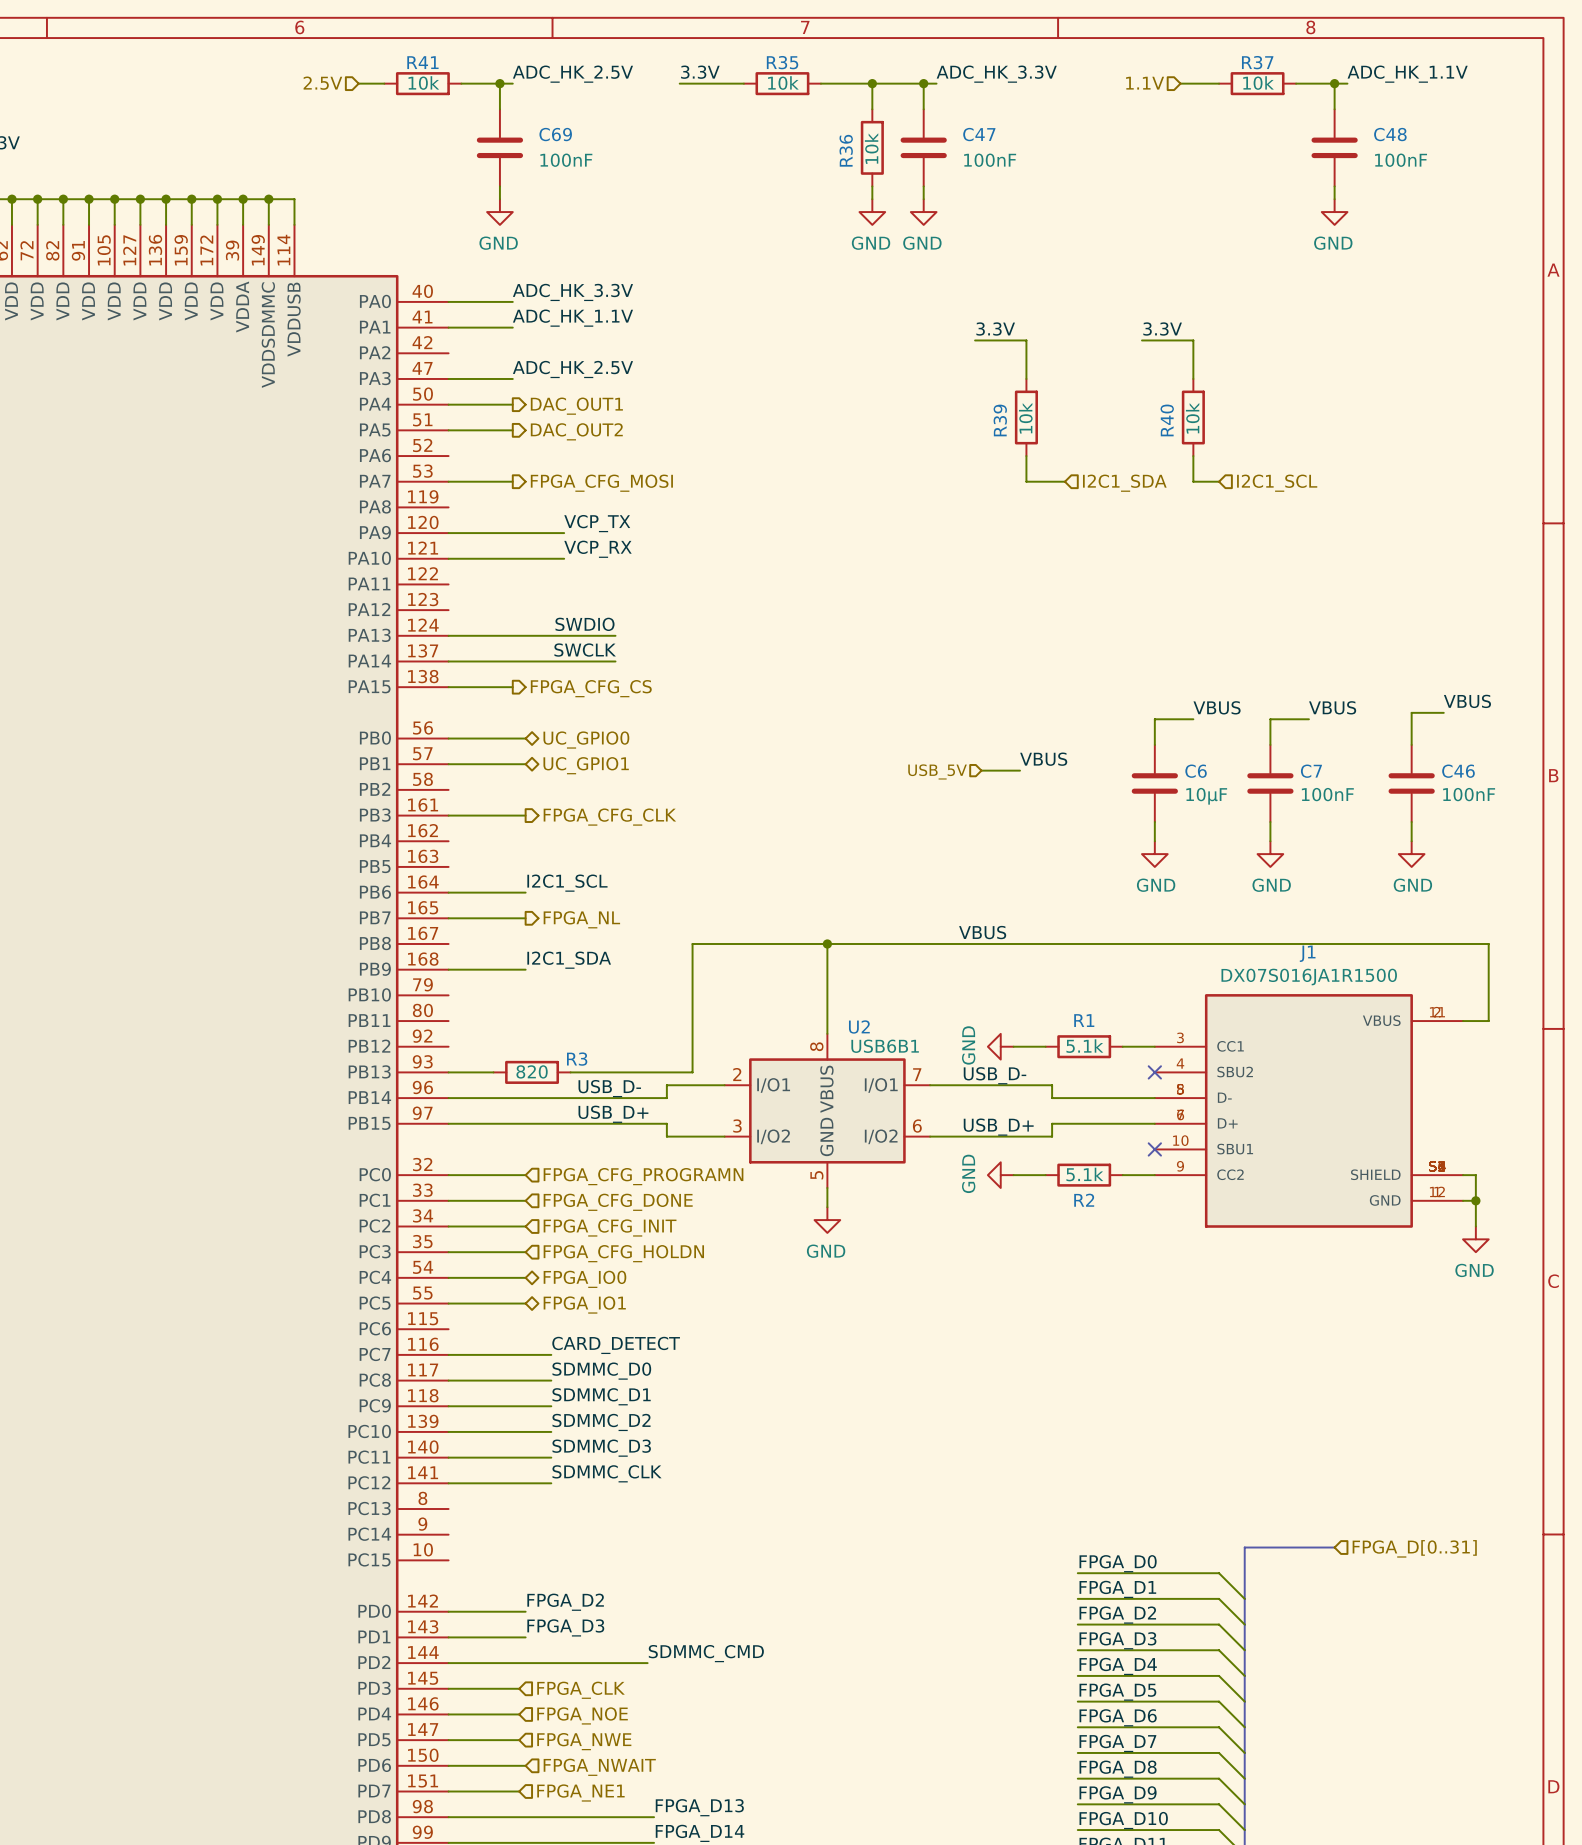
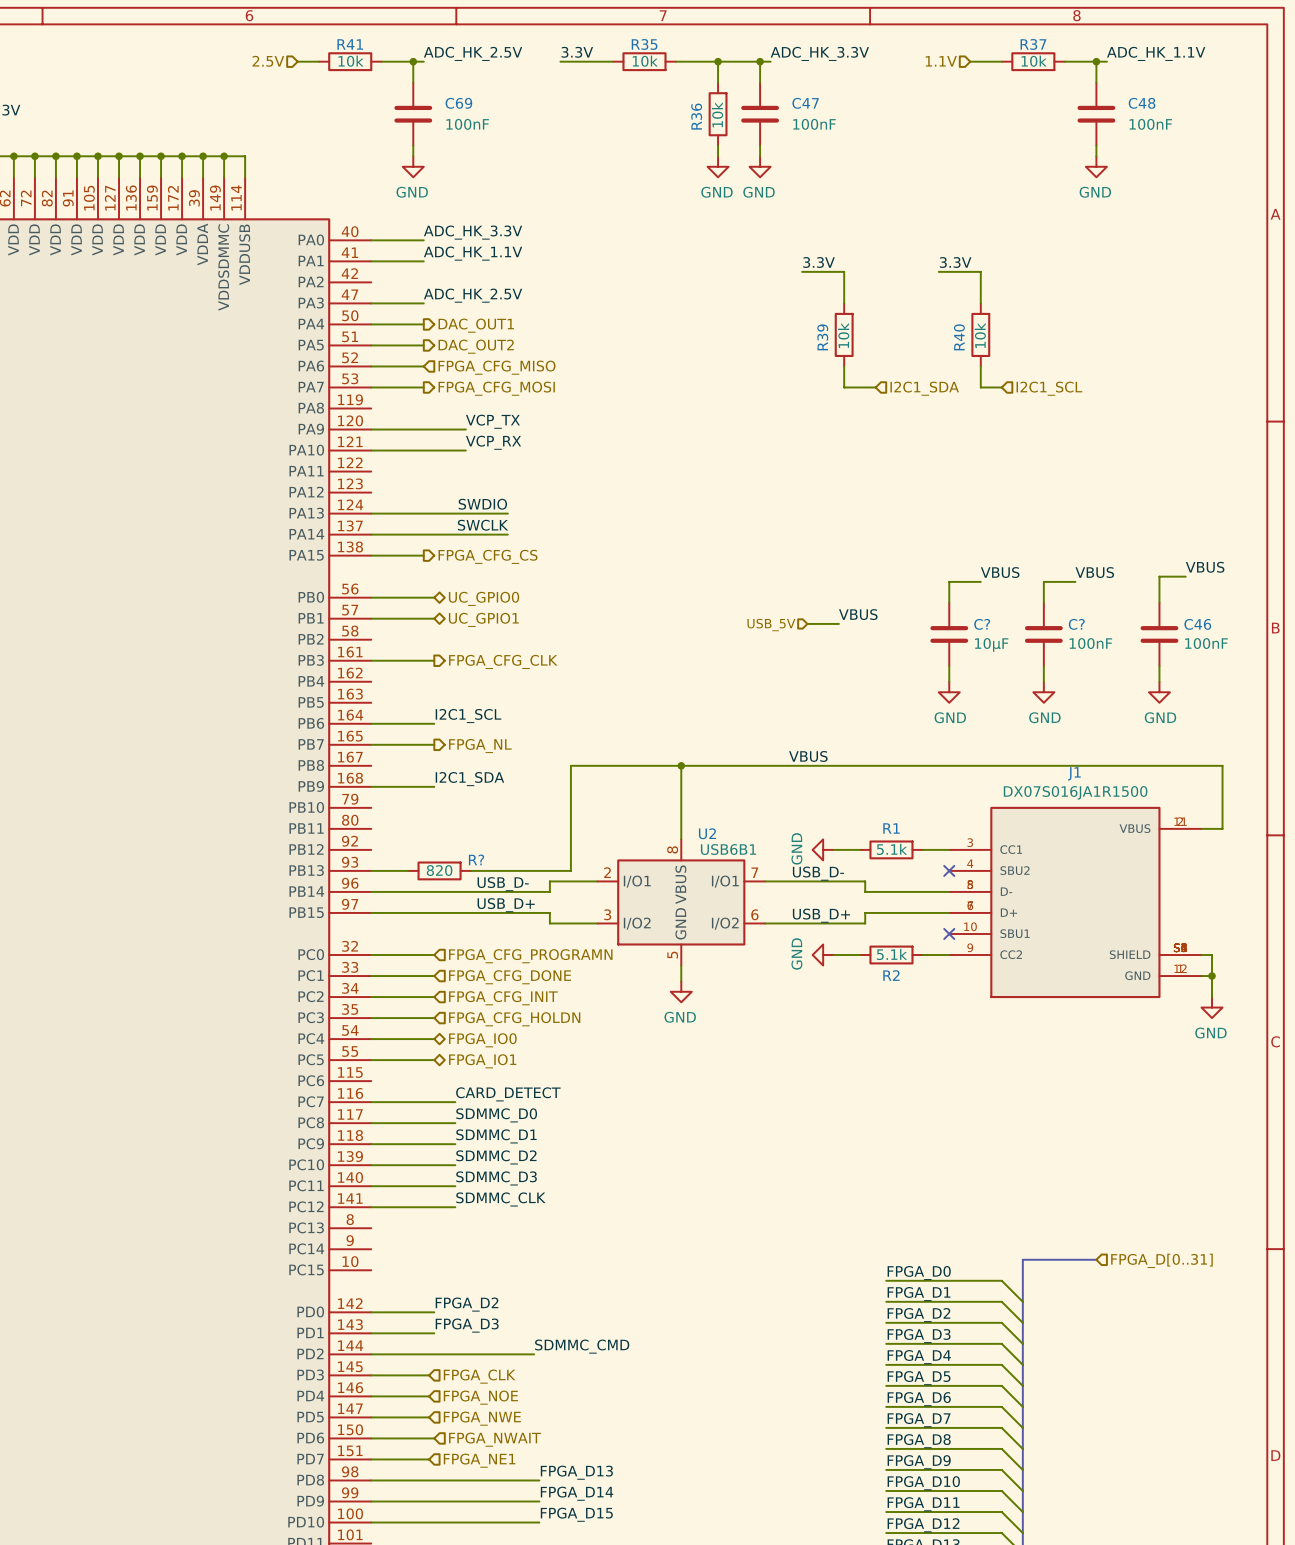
wire: none -> (371, 366) (423, 366)
hierarchical label: none -> FPGA_CFG_MISO (497, 367)
C6 name: C6 (1196, 771) -> C? (982, 624)
C7 name: C7 (1311, 771) -> C? (1076, 624)
R3 name: R3 (577, 1059) -> R? (476, 859)

